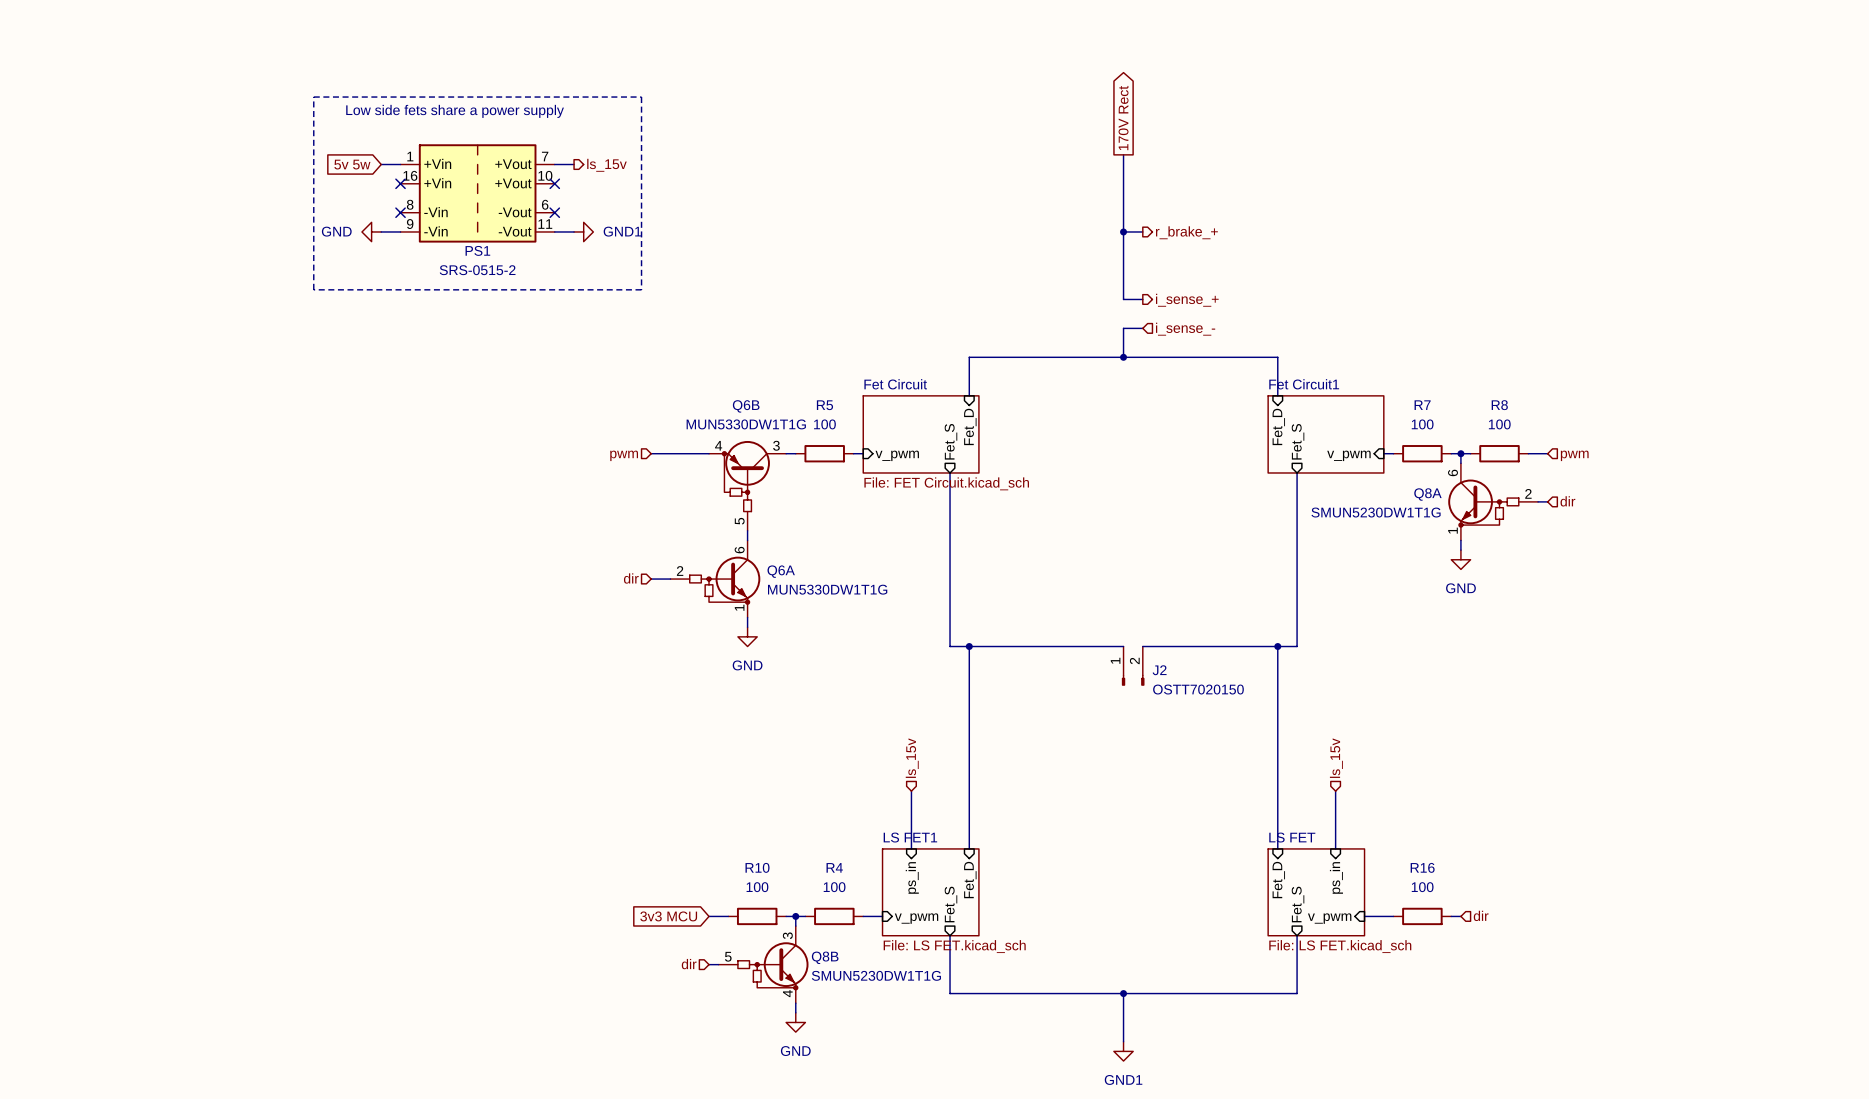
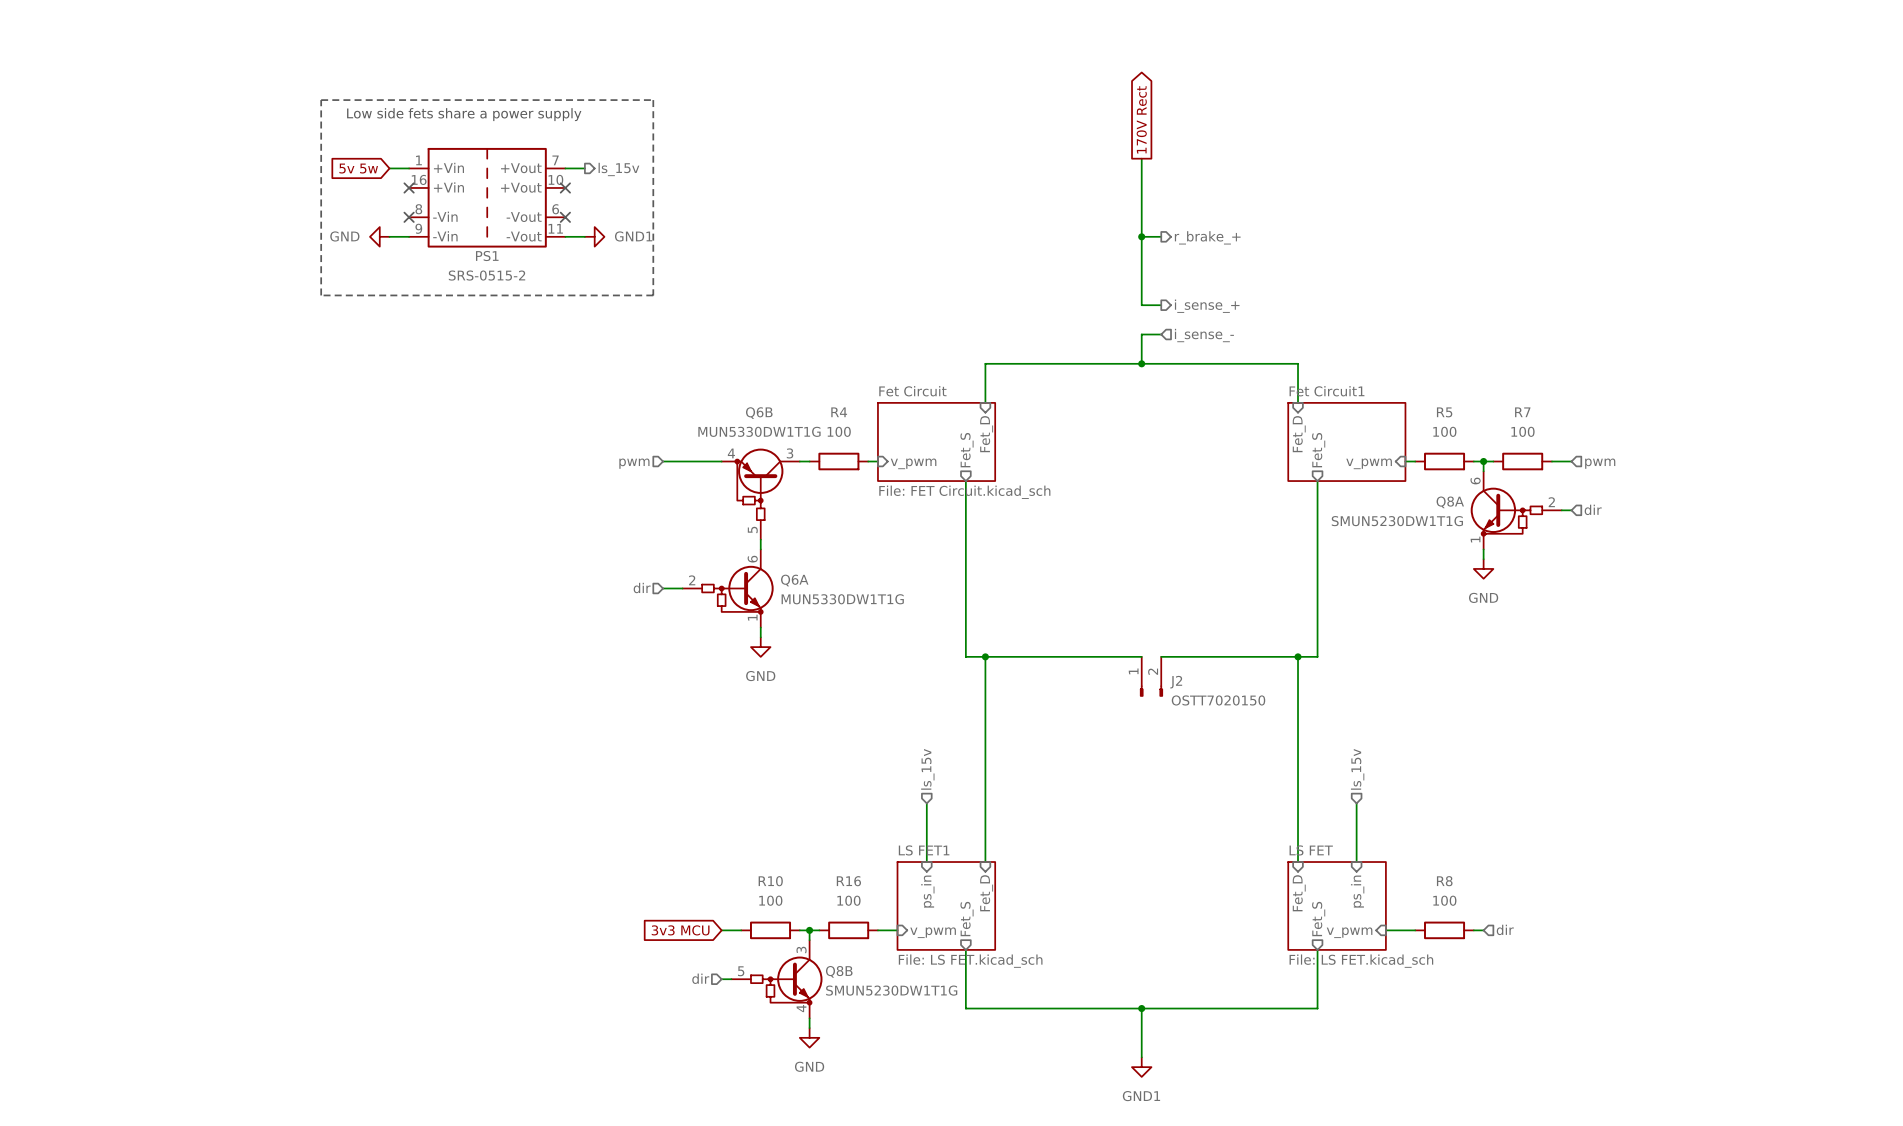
R5 name: R5 (824, 405) -> R4 (839, 412)
R7 name: R7 (1422, 405) -> R5 (1444, 412)
R8 name: R8 (1499, 405) -> R7 (1522, 412)
R4 name: R4 (834, 867) -> R16 (848, 881)
R16 name: R16 (1422, 867) -> R8 (1444, 881)

